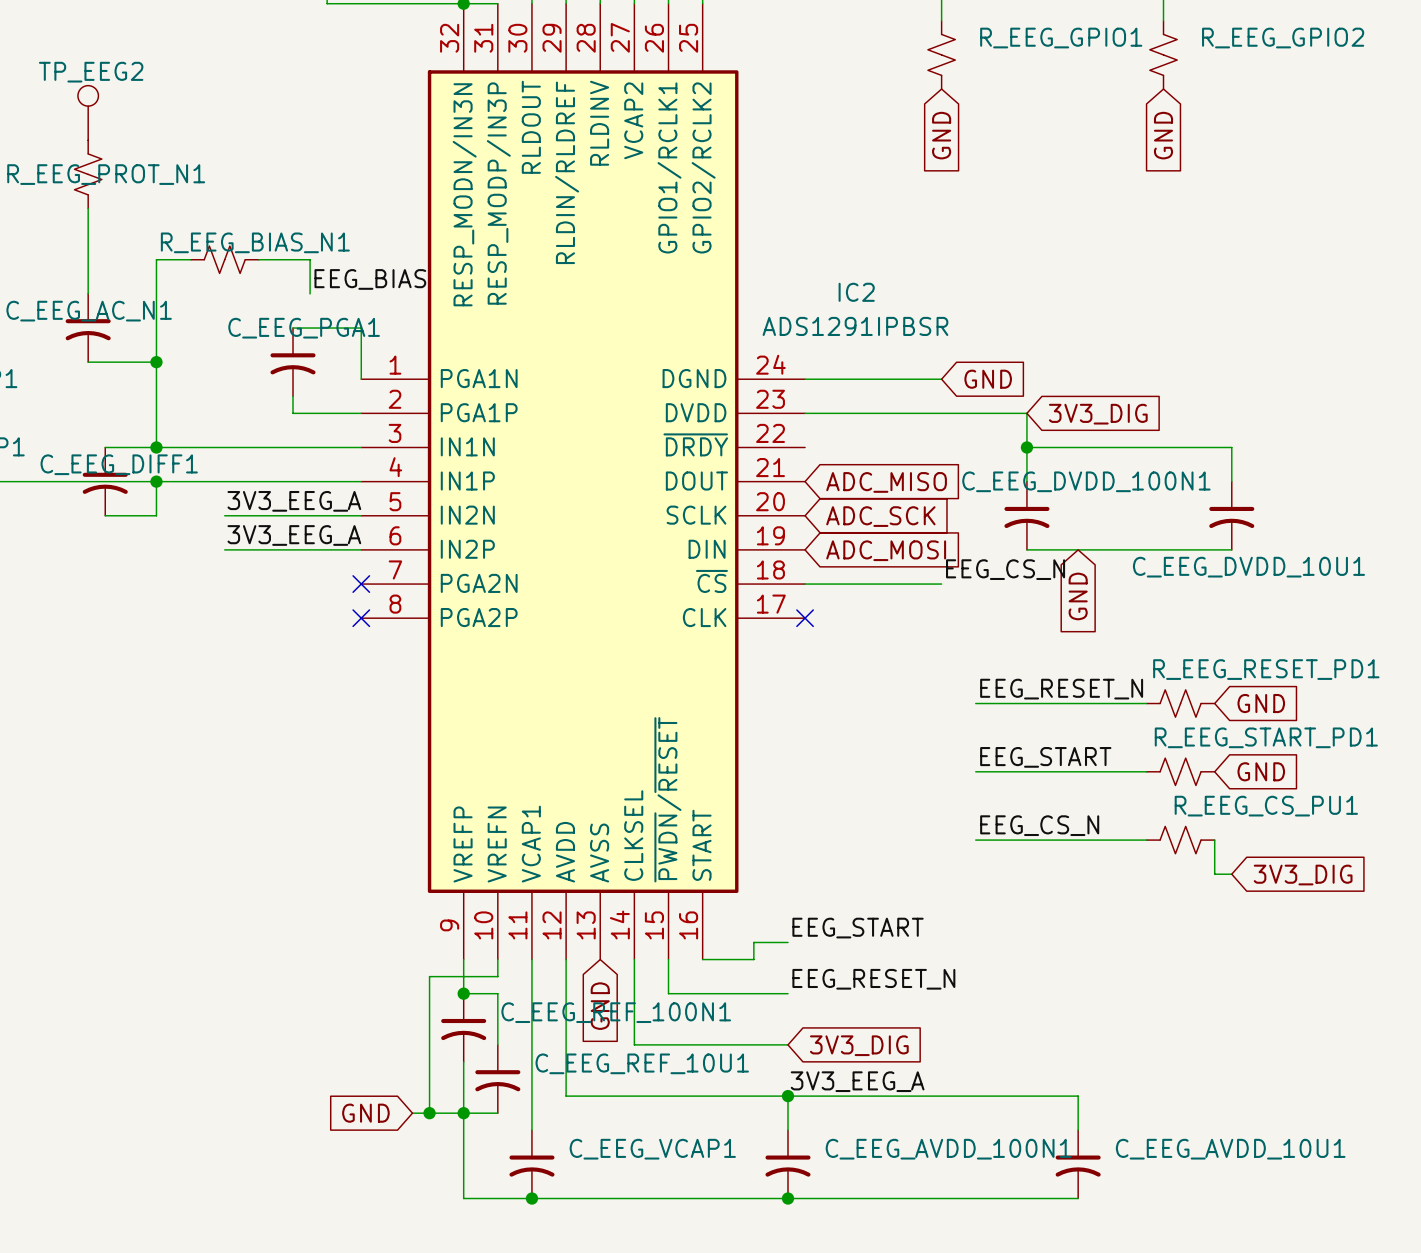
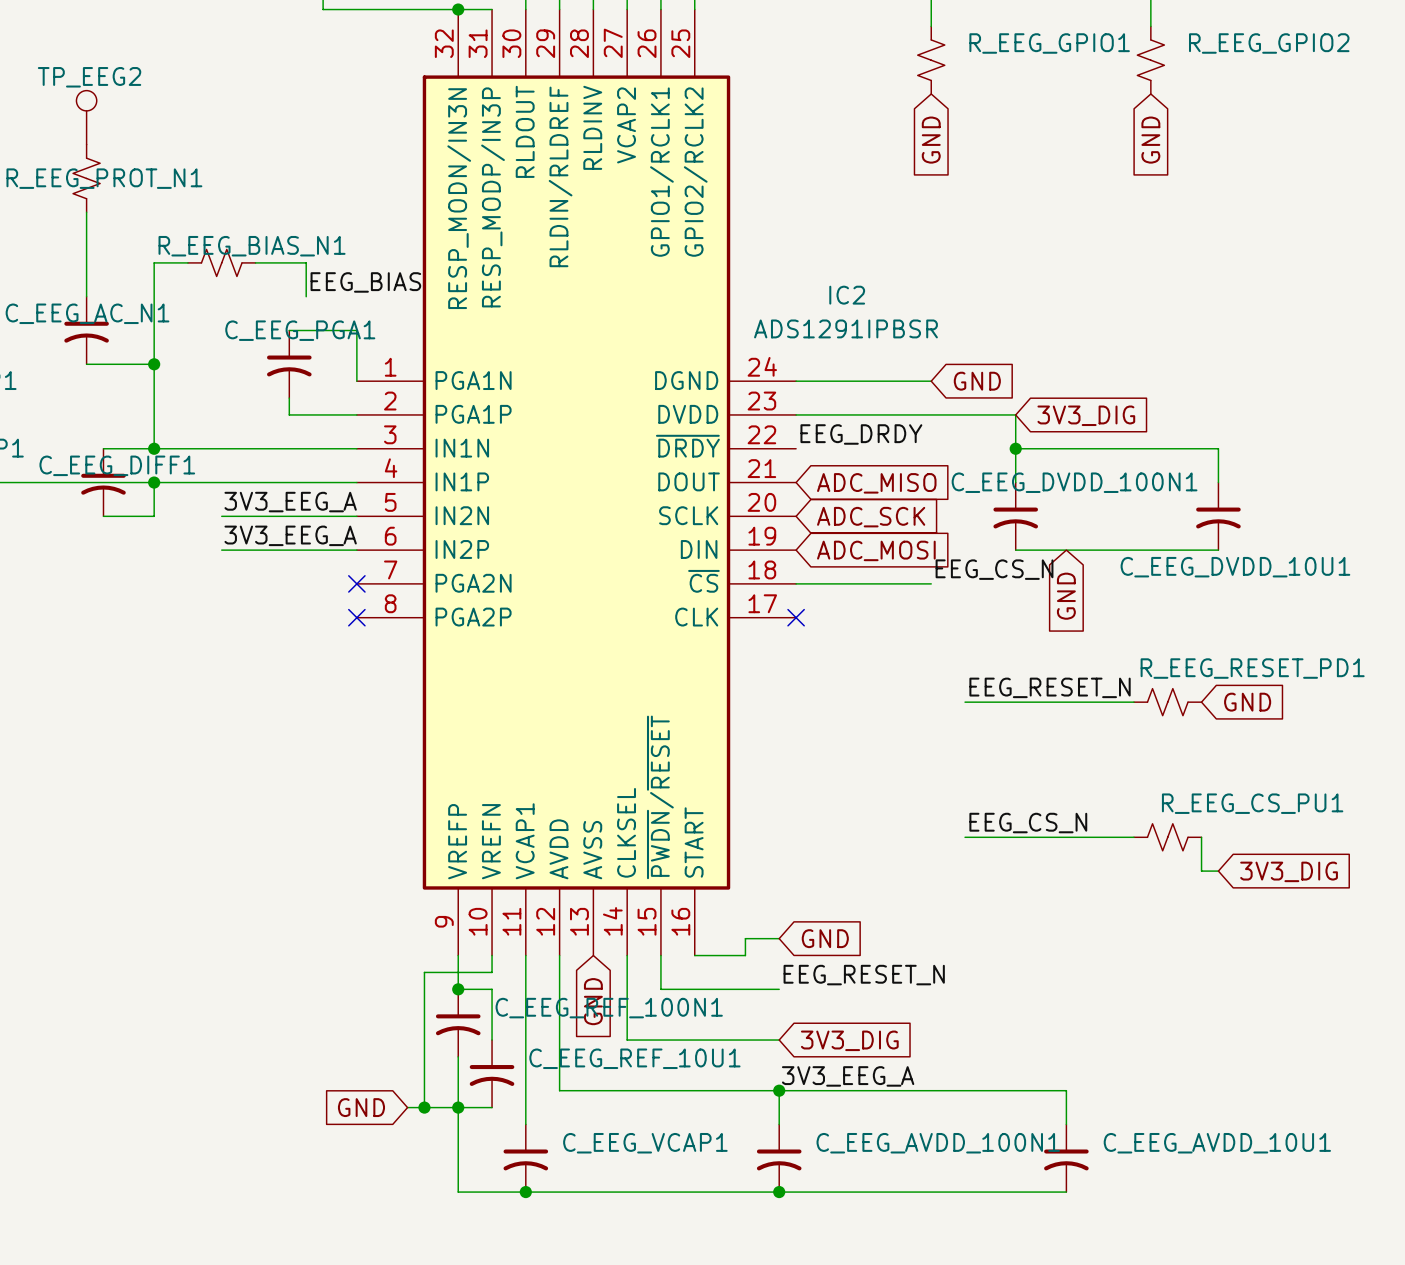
label: none -> EEG_DRDY (861, 434)
label: EEG_START (1045, 757) -> none
wire: (975, 771) (1146, 771) -> none
R_EEG_START_PD1: (1180, 771) -> none
global label: GND (1261, 771) -> none
label: EEG_START (858, 928) -> none
global label: none -> GND (825, 938)

